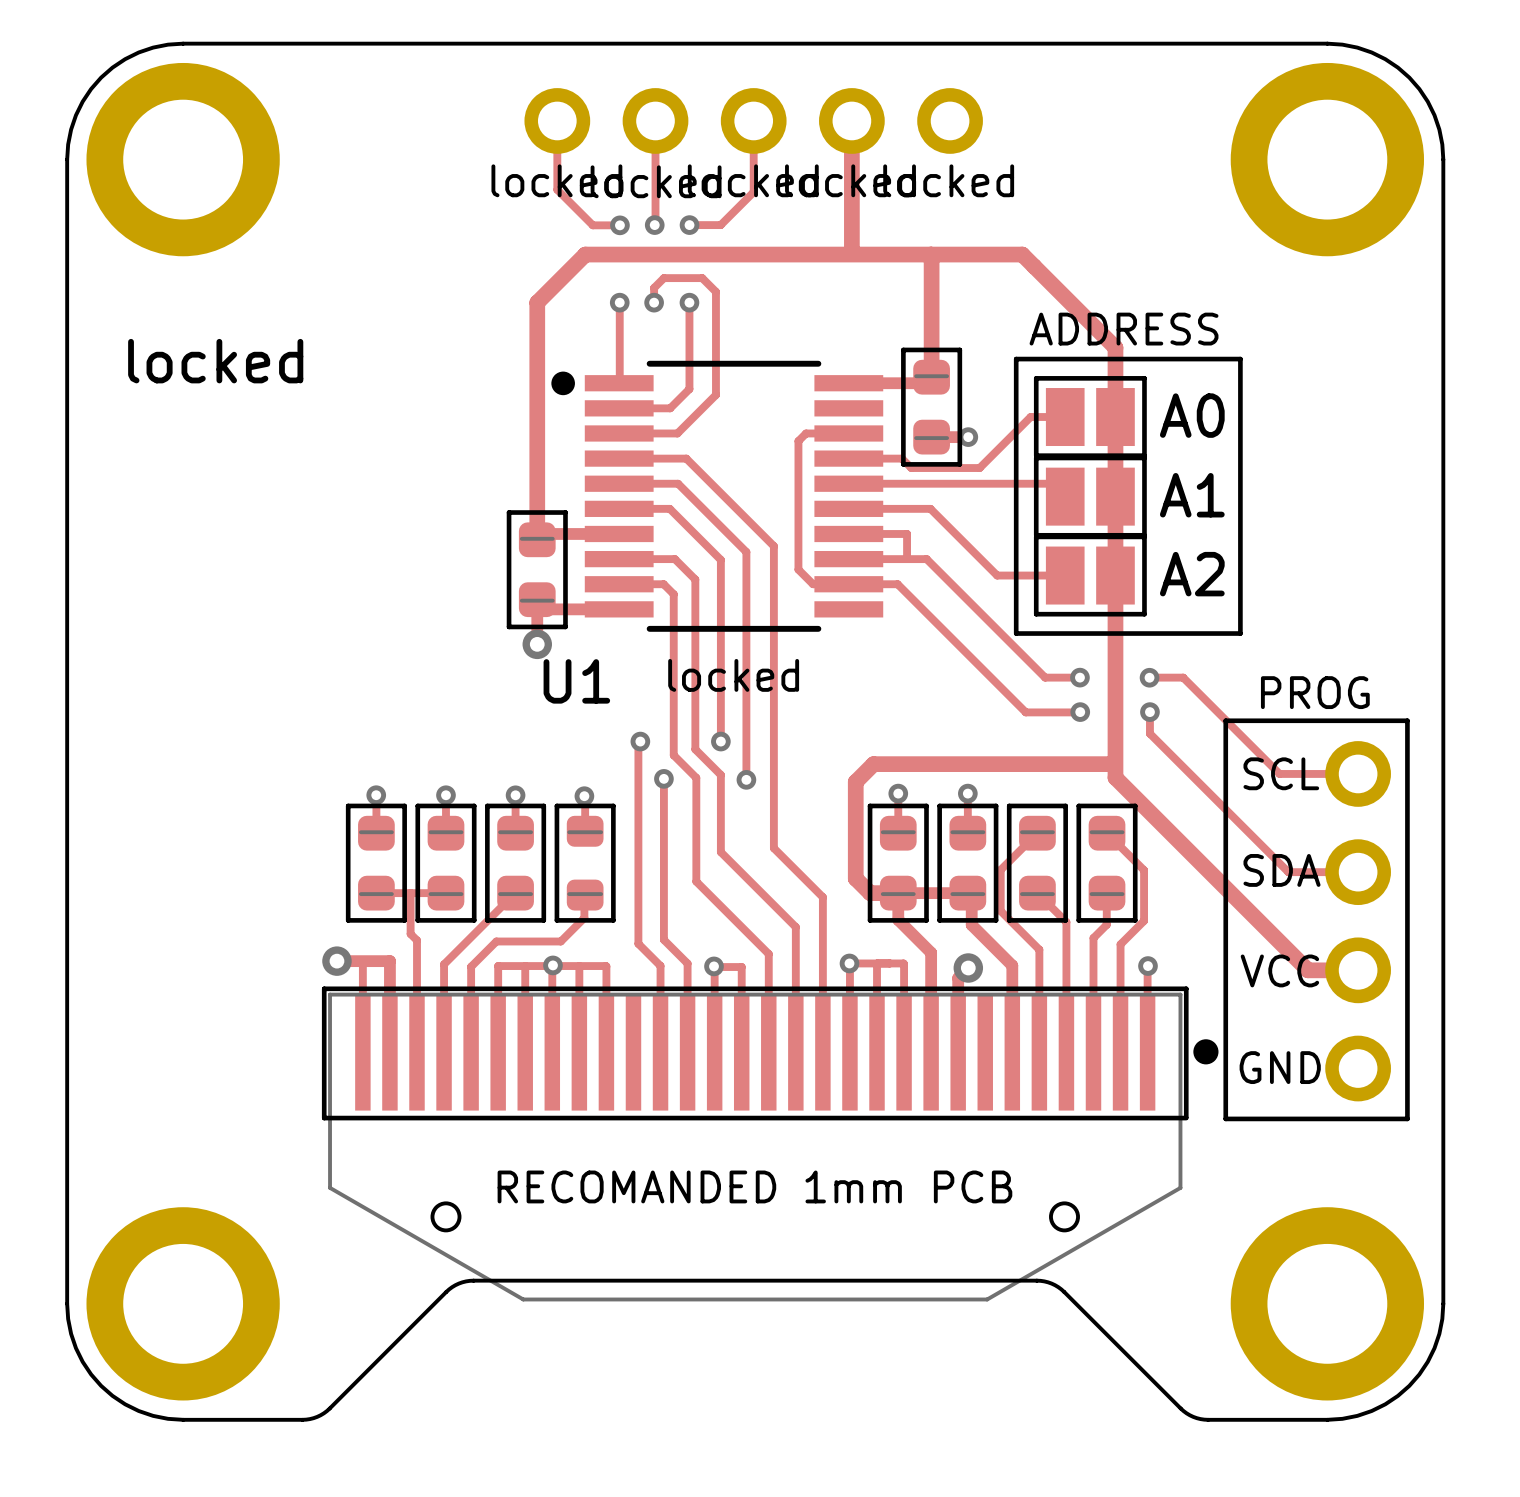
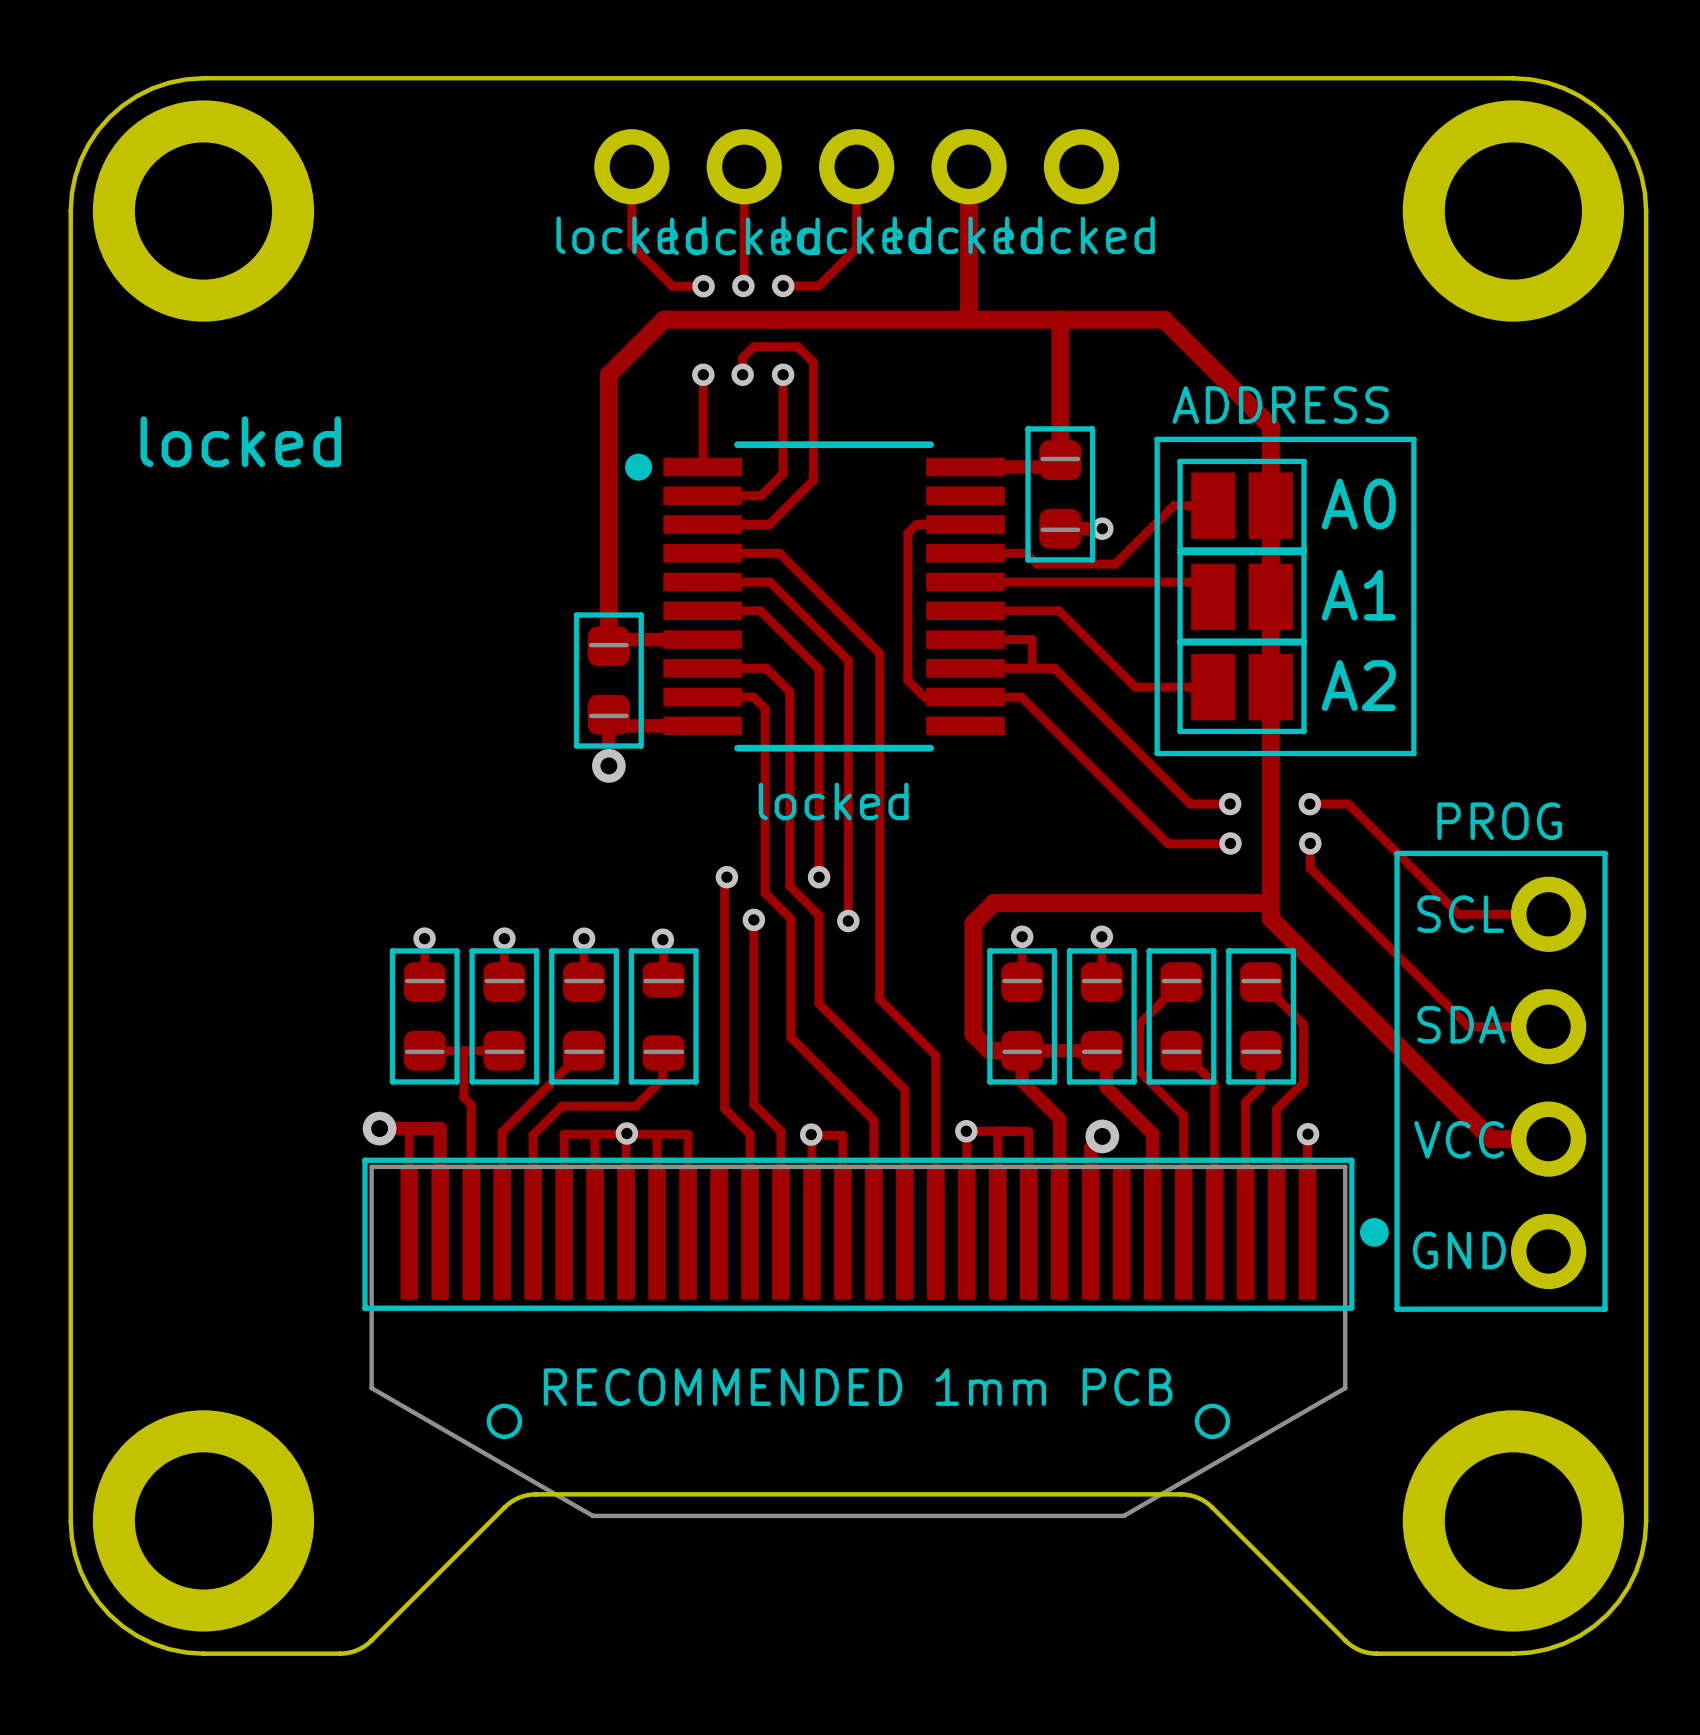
U1 name: U1 (576, 681) -> none
text: RECOMANDED 1mm PCB (754, 1186) -> RECOMMENDED 1mm PCB (858, 1387)

